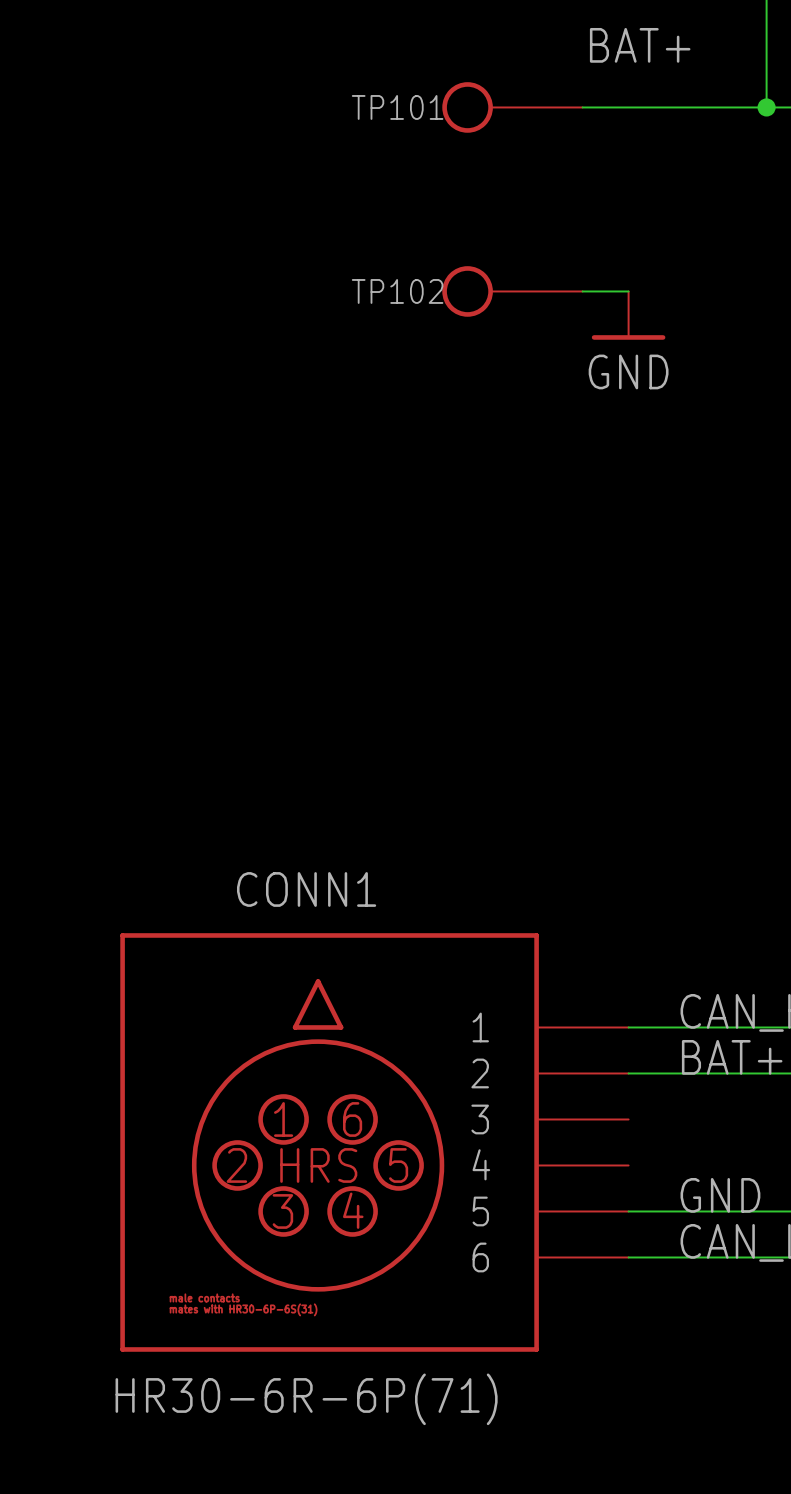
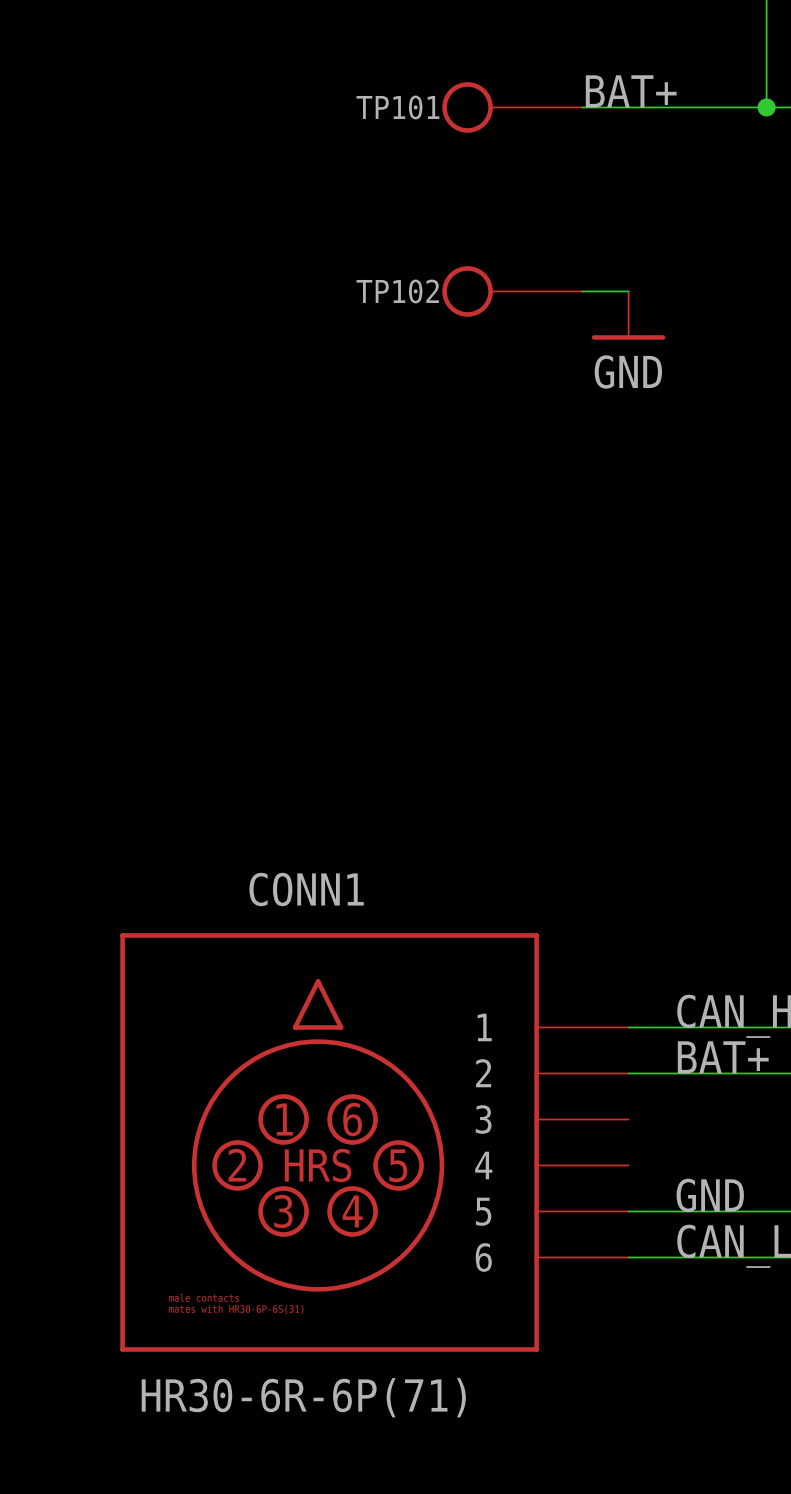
label position: BAT+ (640, 45) -> BAT+ (631, 91)

